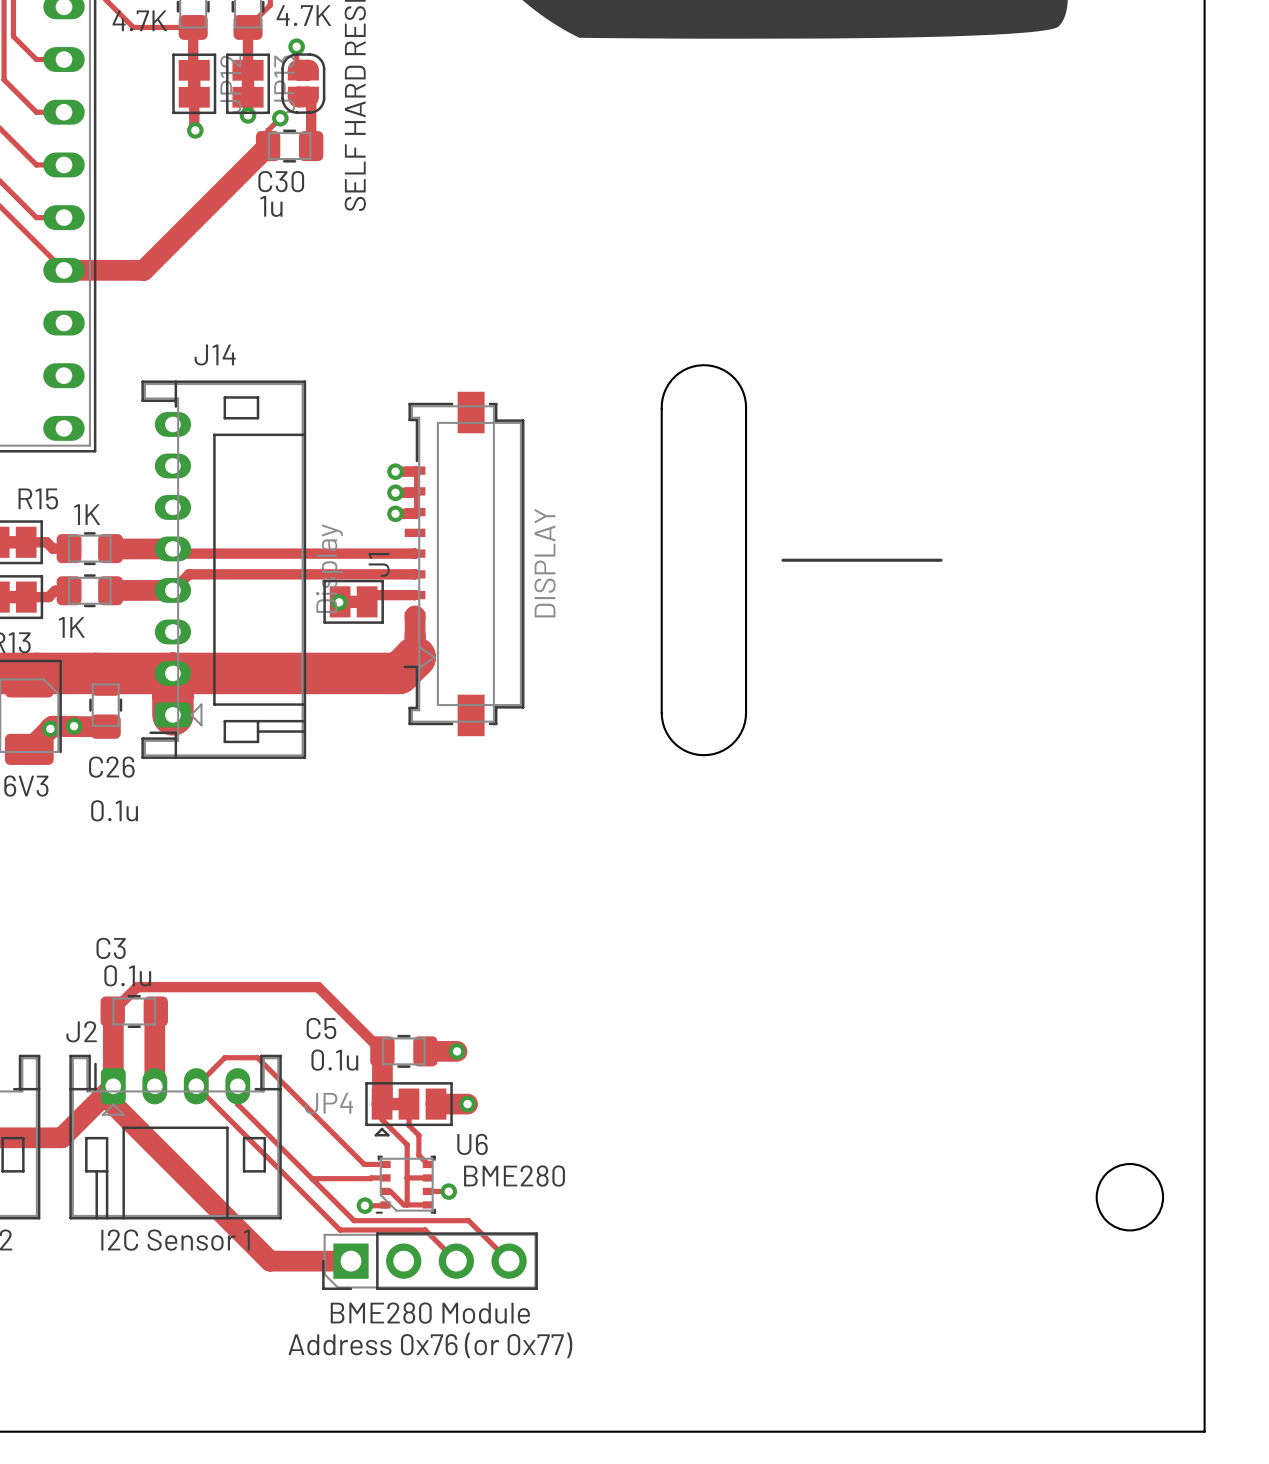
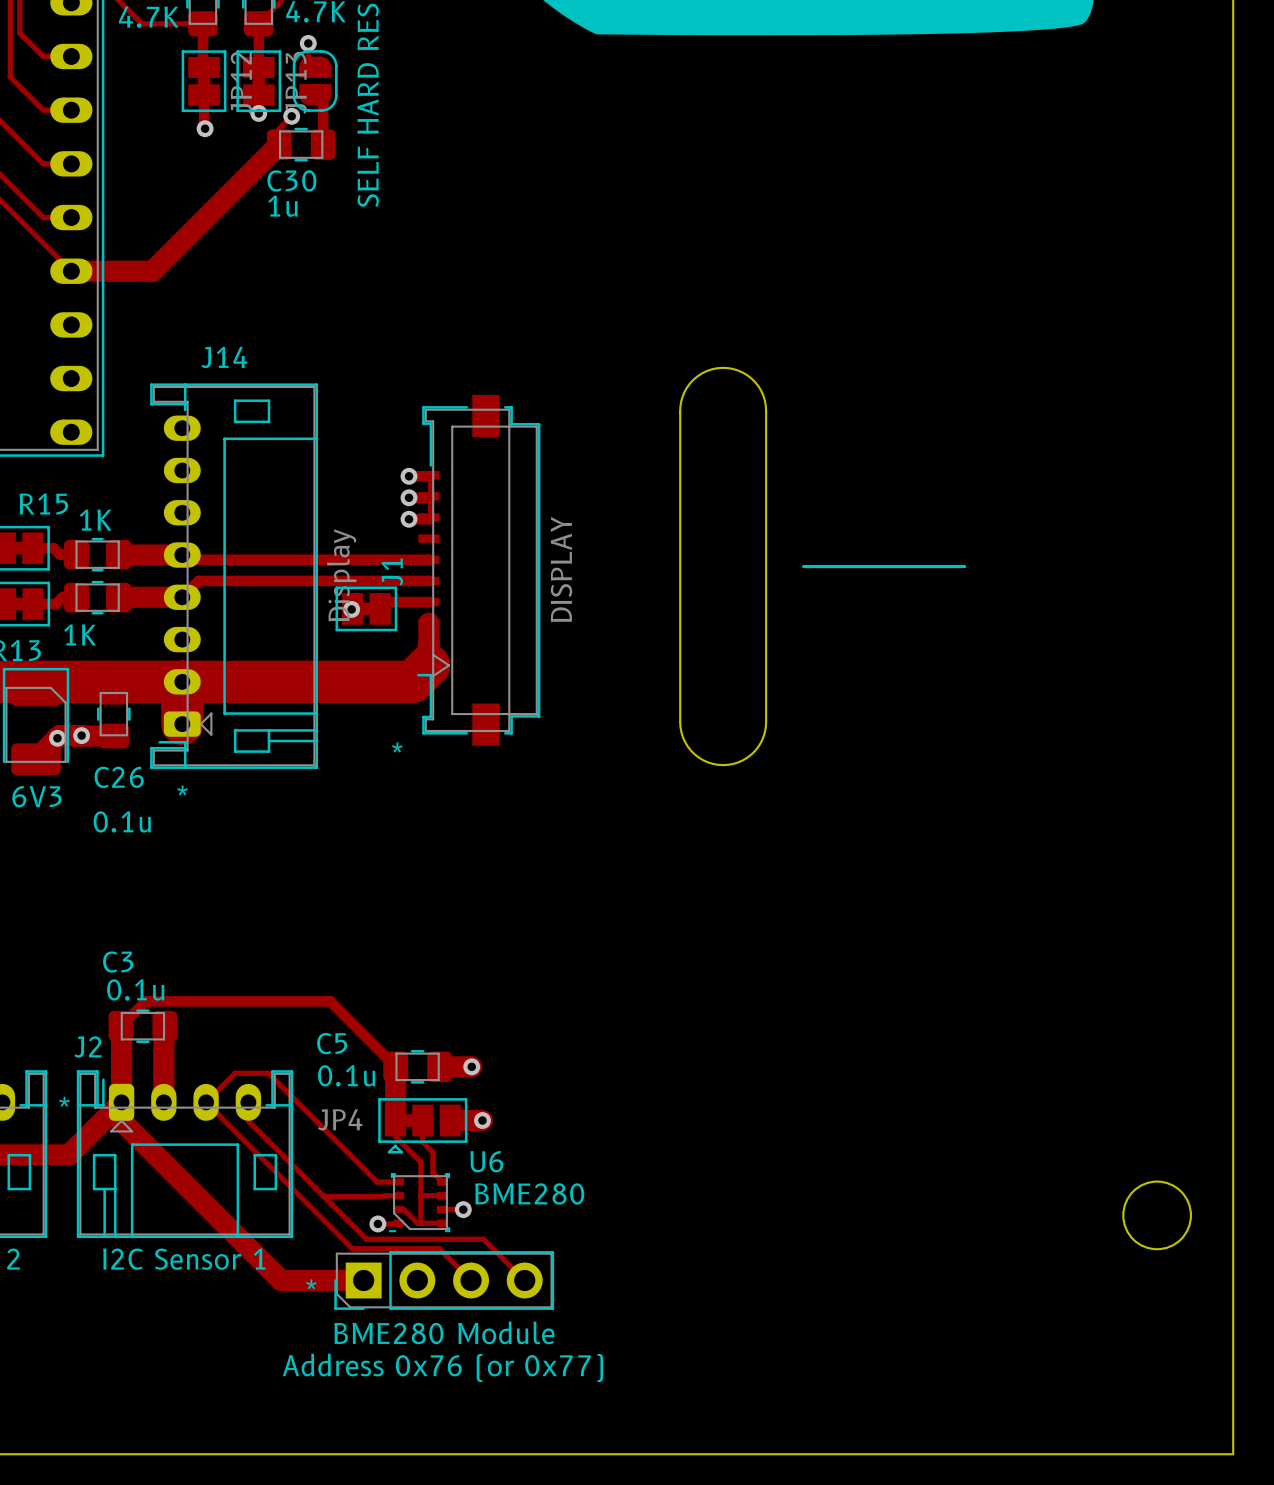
text: none -> * (397, 747)
text: none -> * (182, 790)
text: none -> * (64, 1101)
text: none -> * (311, 1284)

